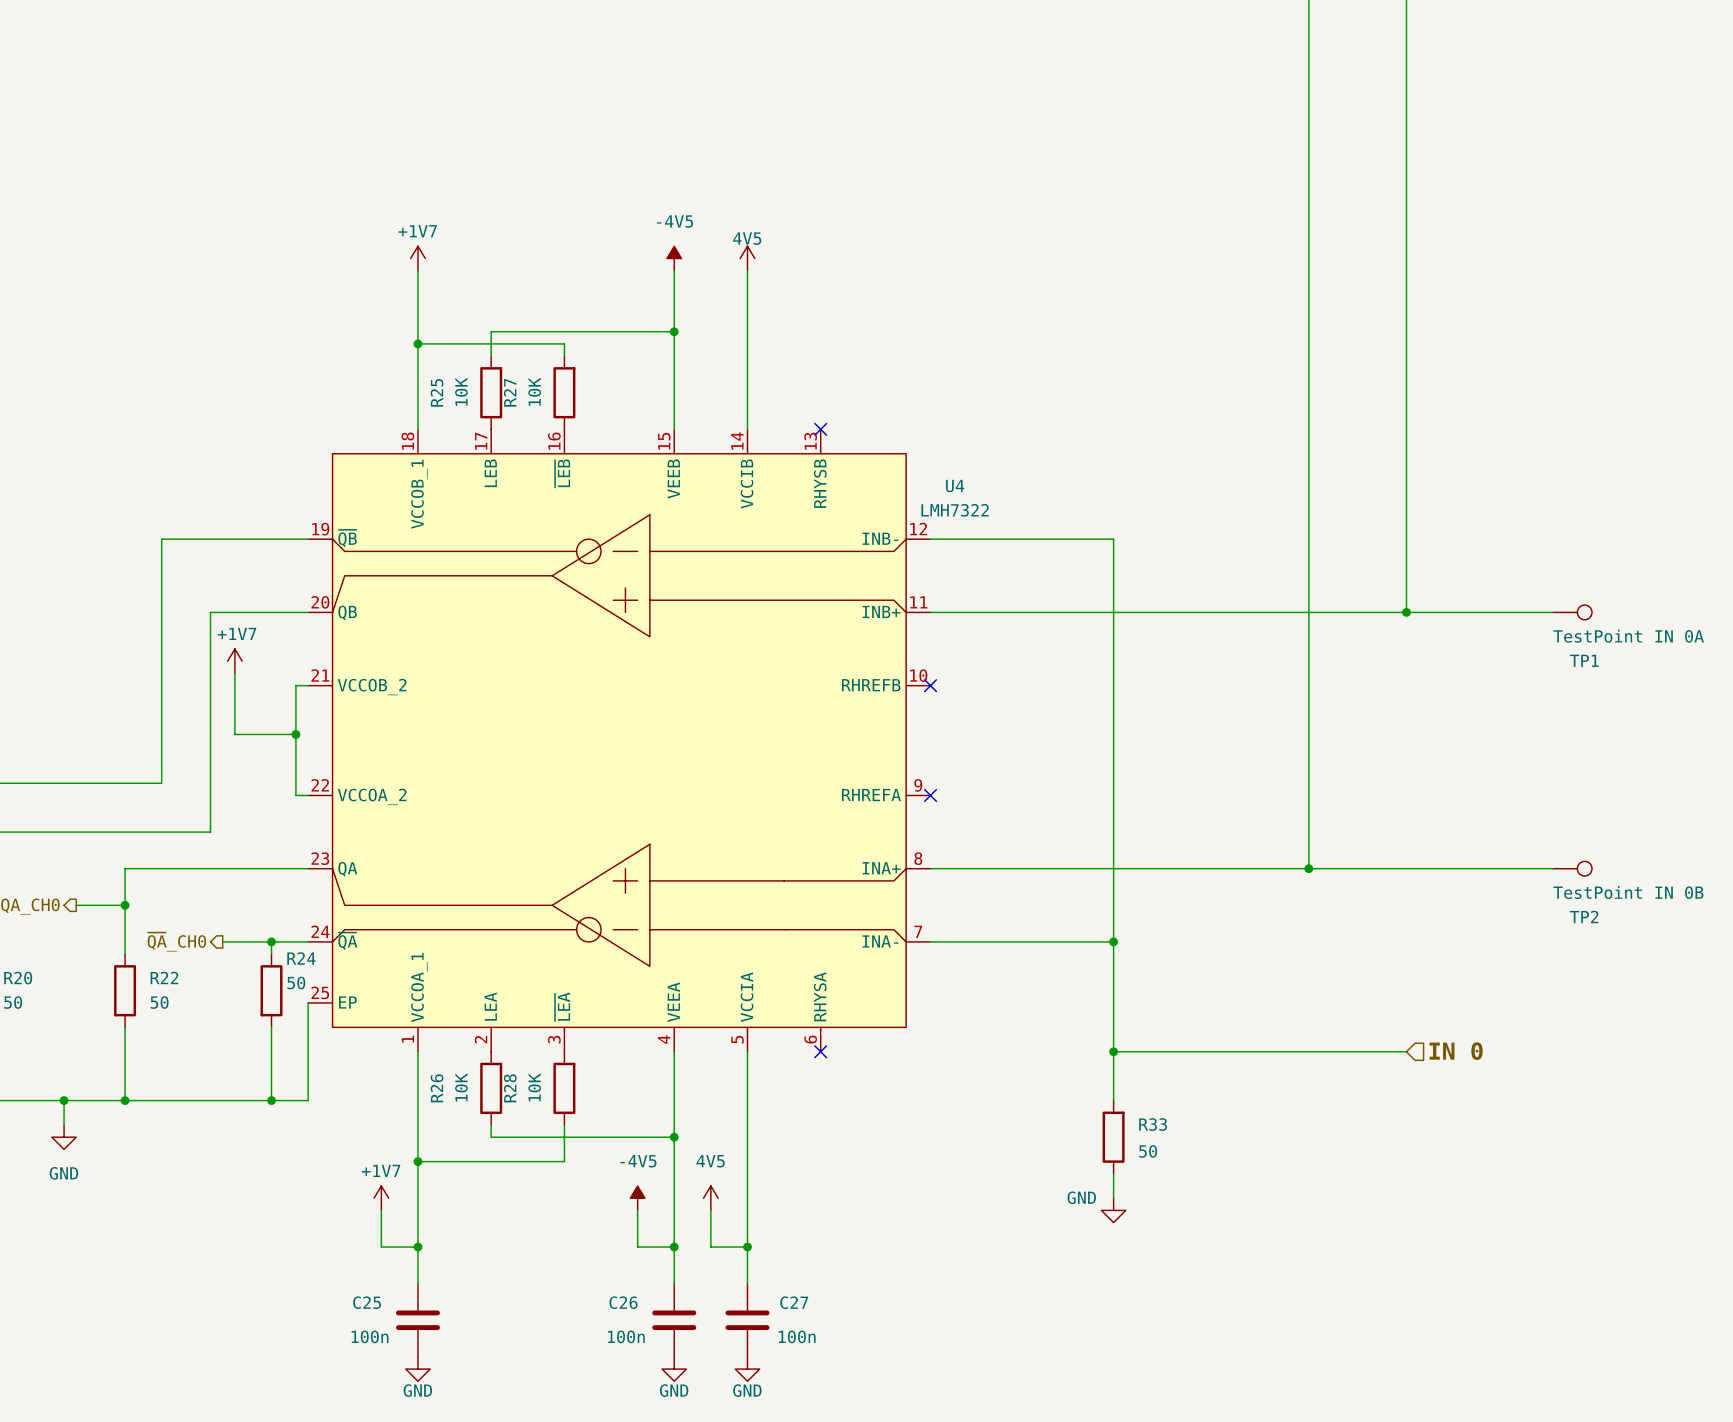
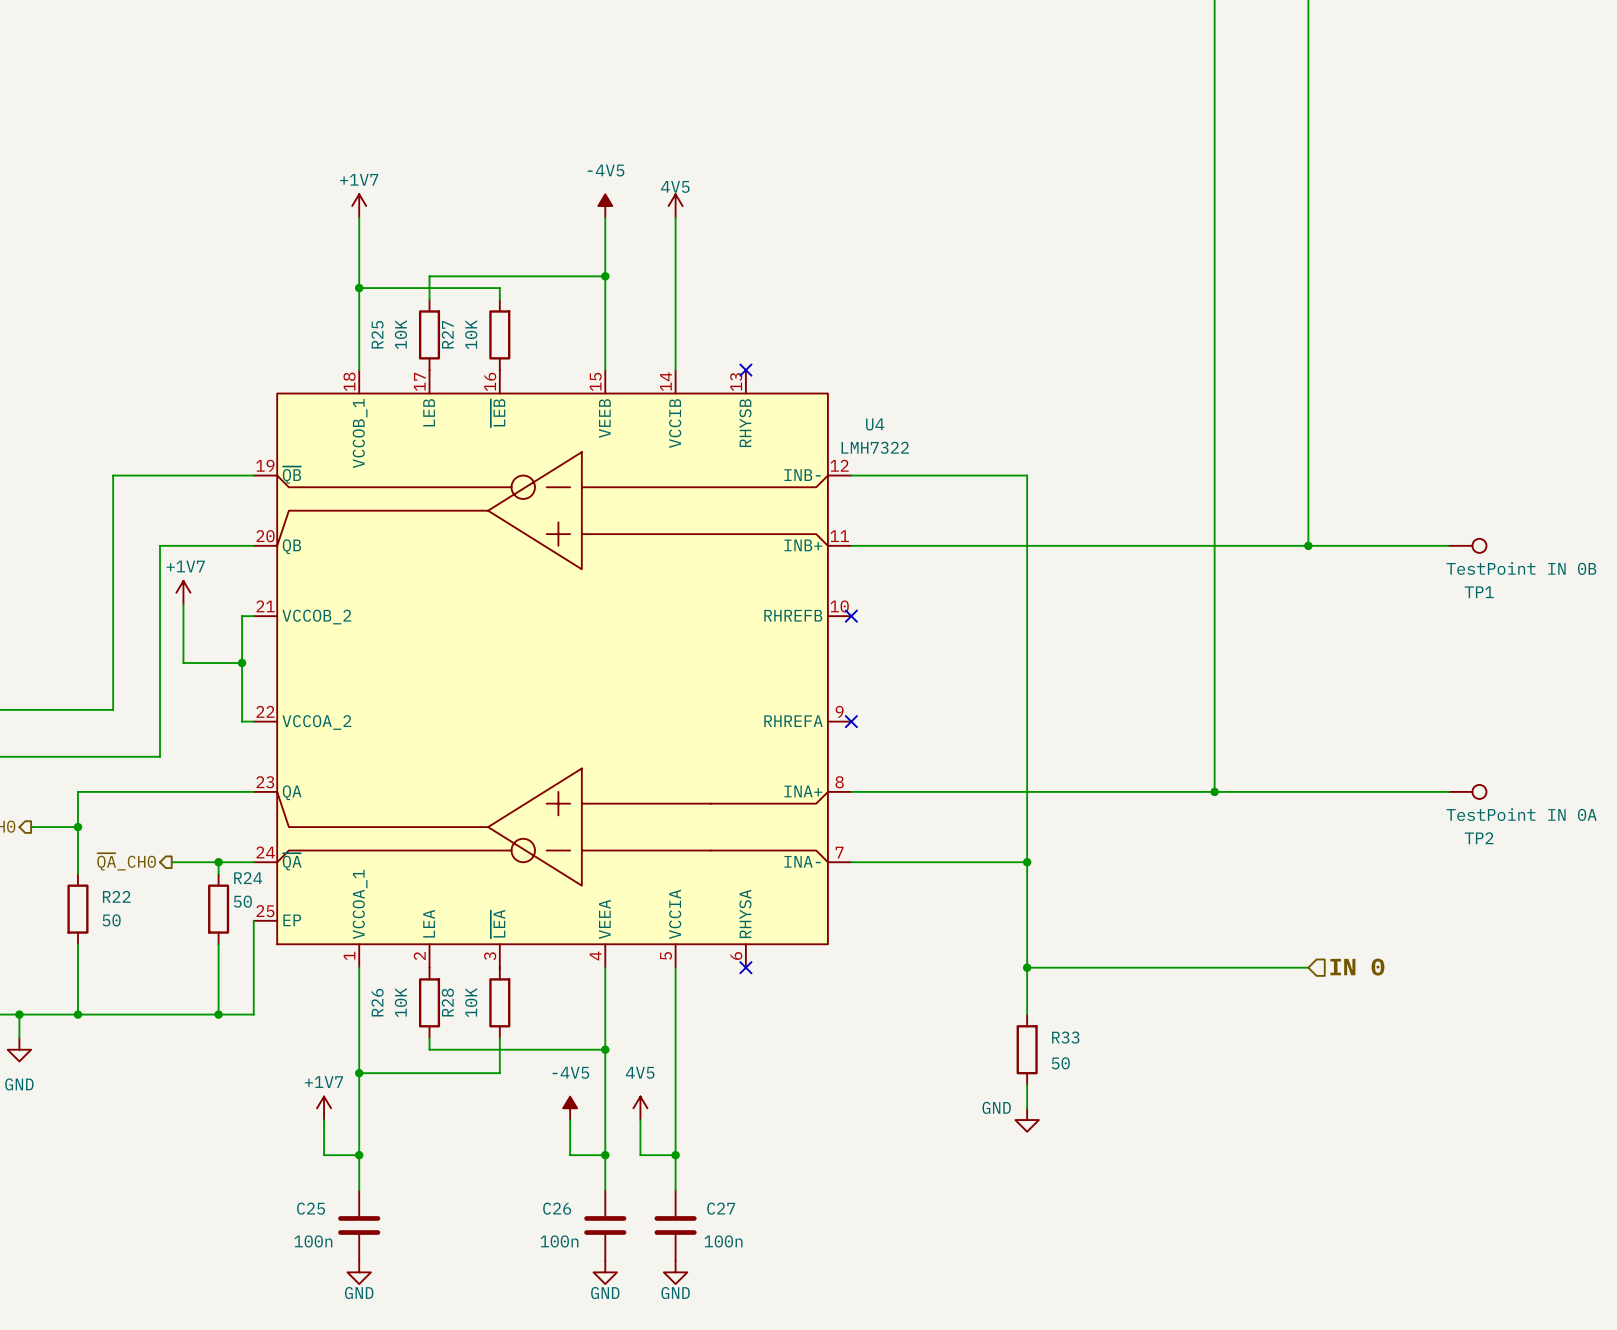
TP1 value: TestPoint IN 0A (1628, 636) -> TestPoint IN 0B (1521, 568)
TP2 value: TestPoint IN 0B (1628, 892) -> TestPoint IN 0A (1521, 814)

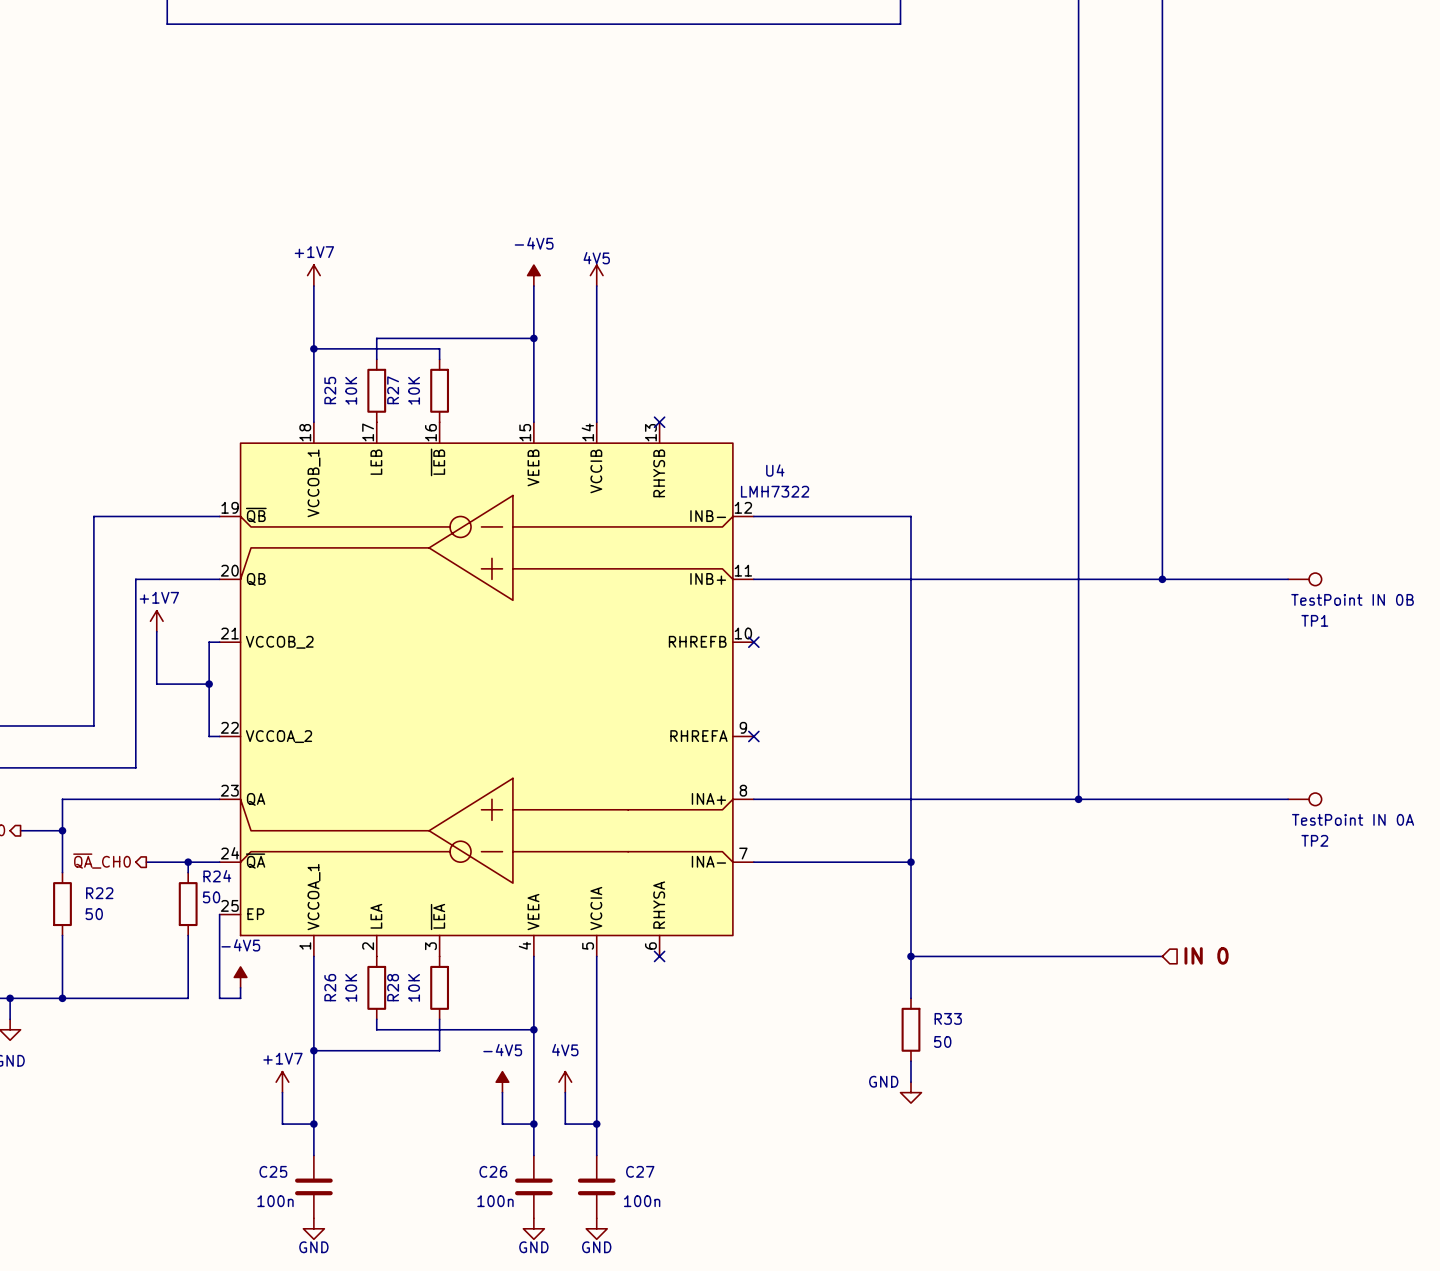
power symbol: none -> -4V5 (240, 977)
wire: (218, 1014) (253, 1014) -> (240, 987) (240, 998) (219, 998)
junction: (218, 1014) -> none

